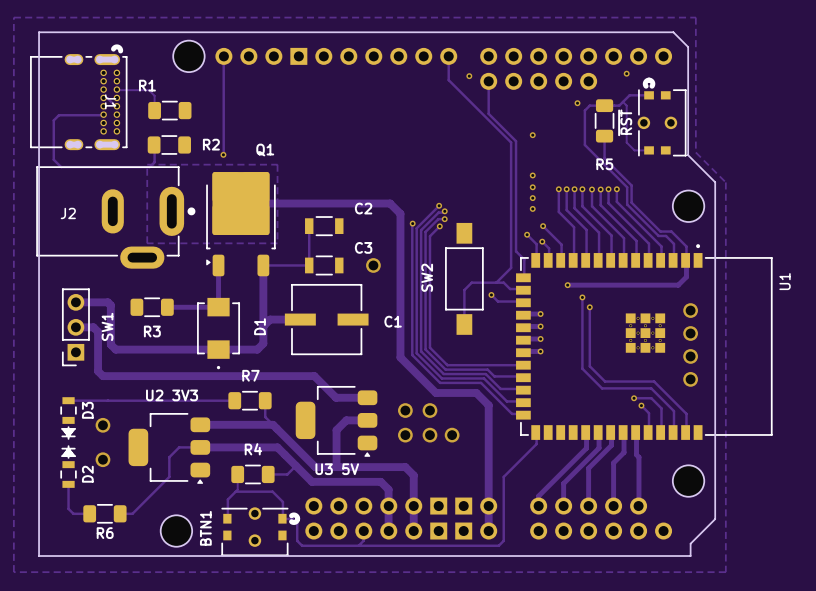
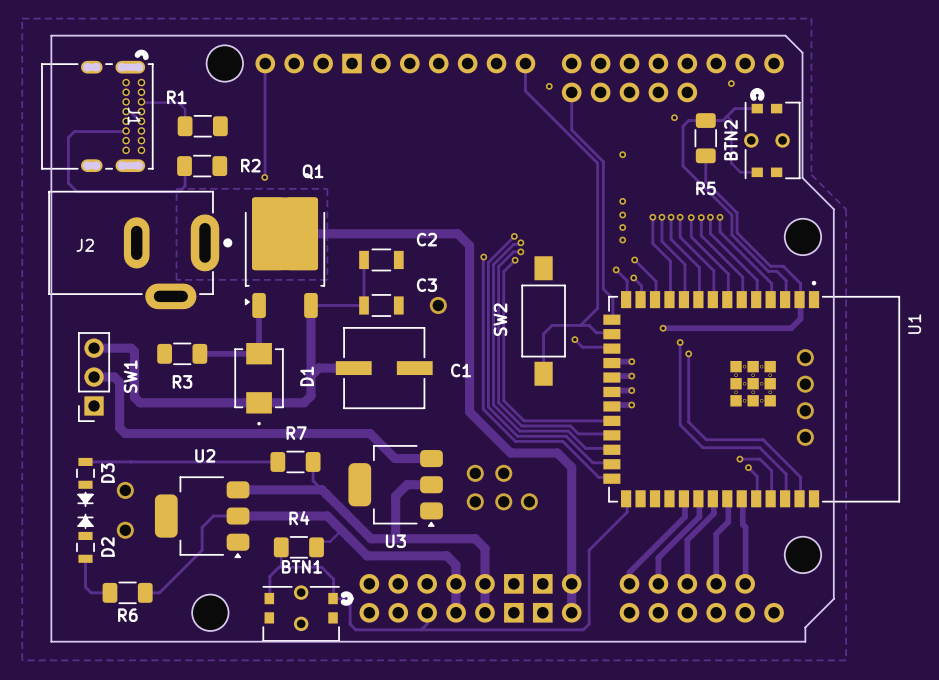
~{RST} name: ~{RST} (625, 122) -> BTN2 (730, 140)
U2 3V3 name: U2 3V3 (172, 395) -> U2 (205, 455)
track: none -> (341, 530) (330, 541) (316, 541)
track: (295, 465) (287, 474) (268, 474) -> none
U3 5V name: U3 5V (337, 469) -> U3 (395, 541)
BTN1 name rotation: 0° (205, 528) -> 90° clockwise (302, 566)
BTN1 name position: BTN1 (205, 528) -> BTN1 (302, 566)

